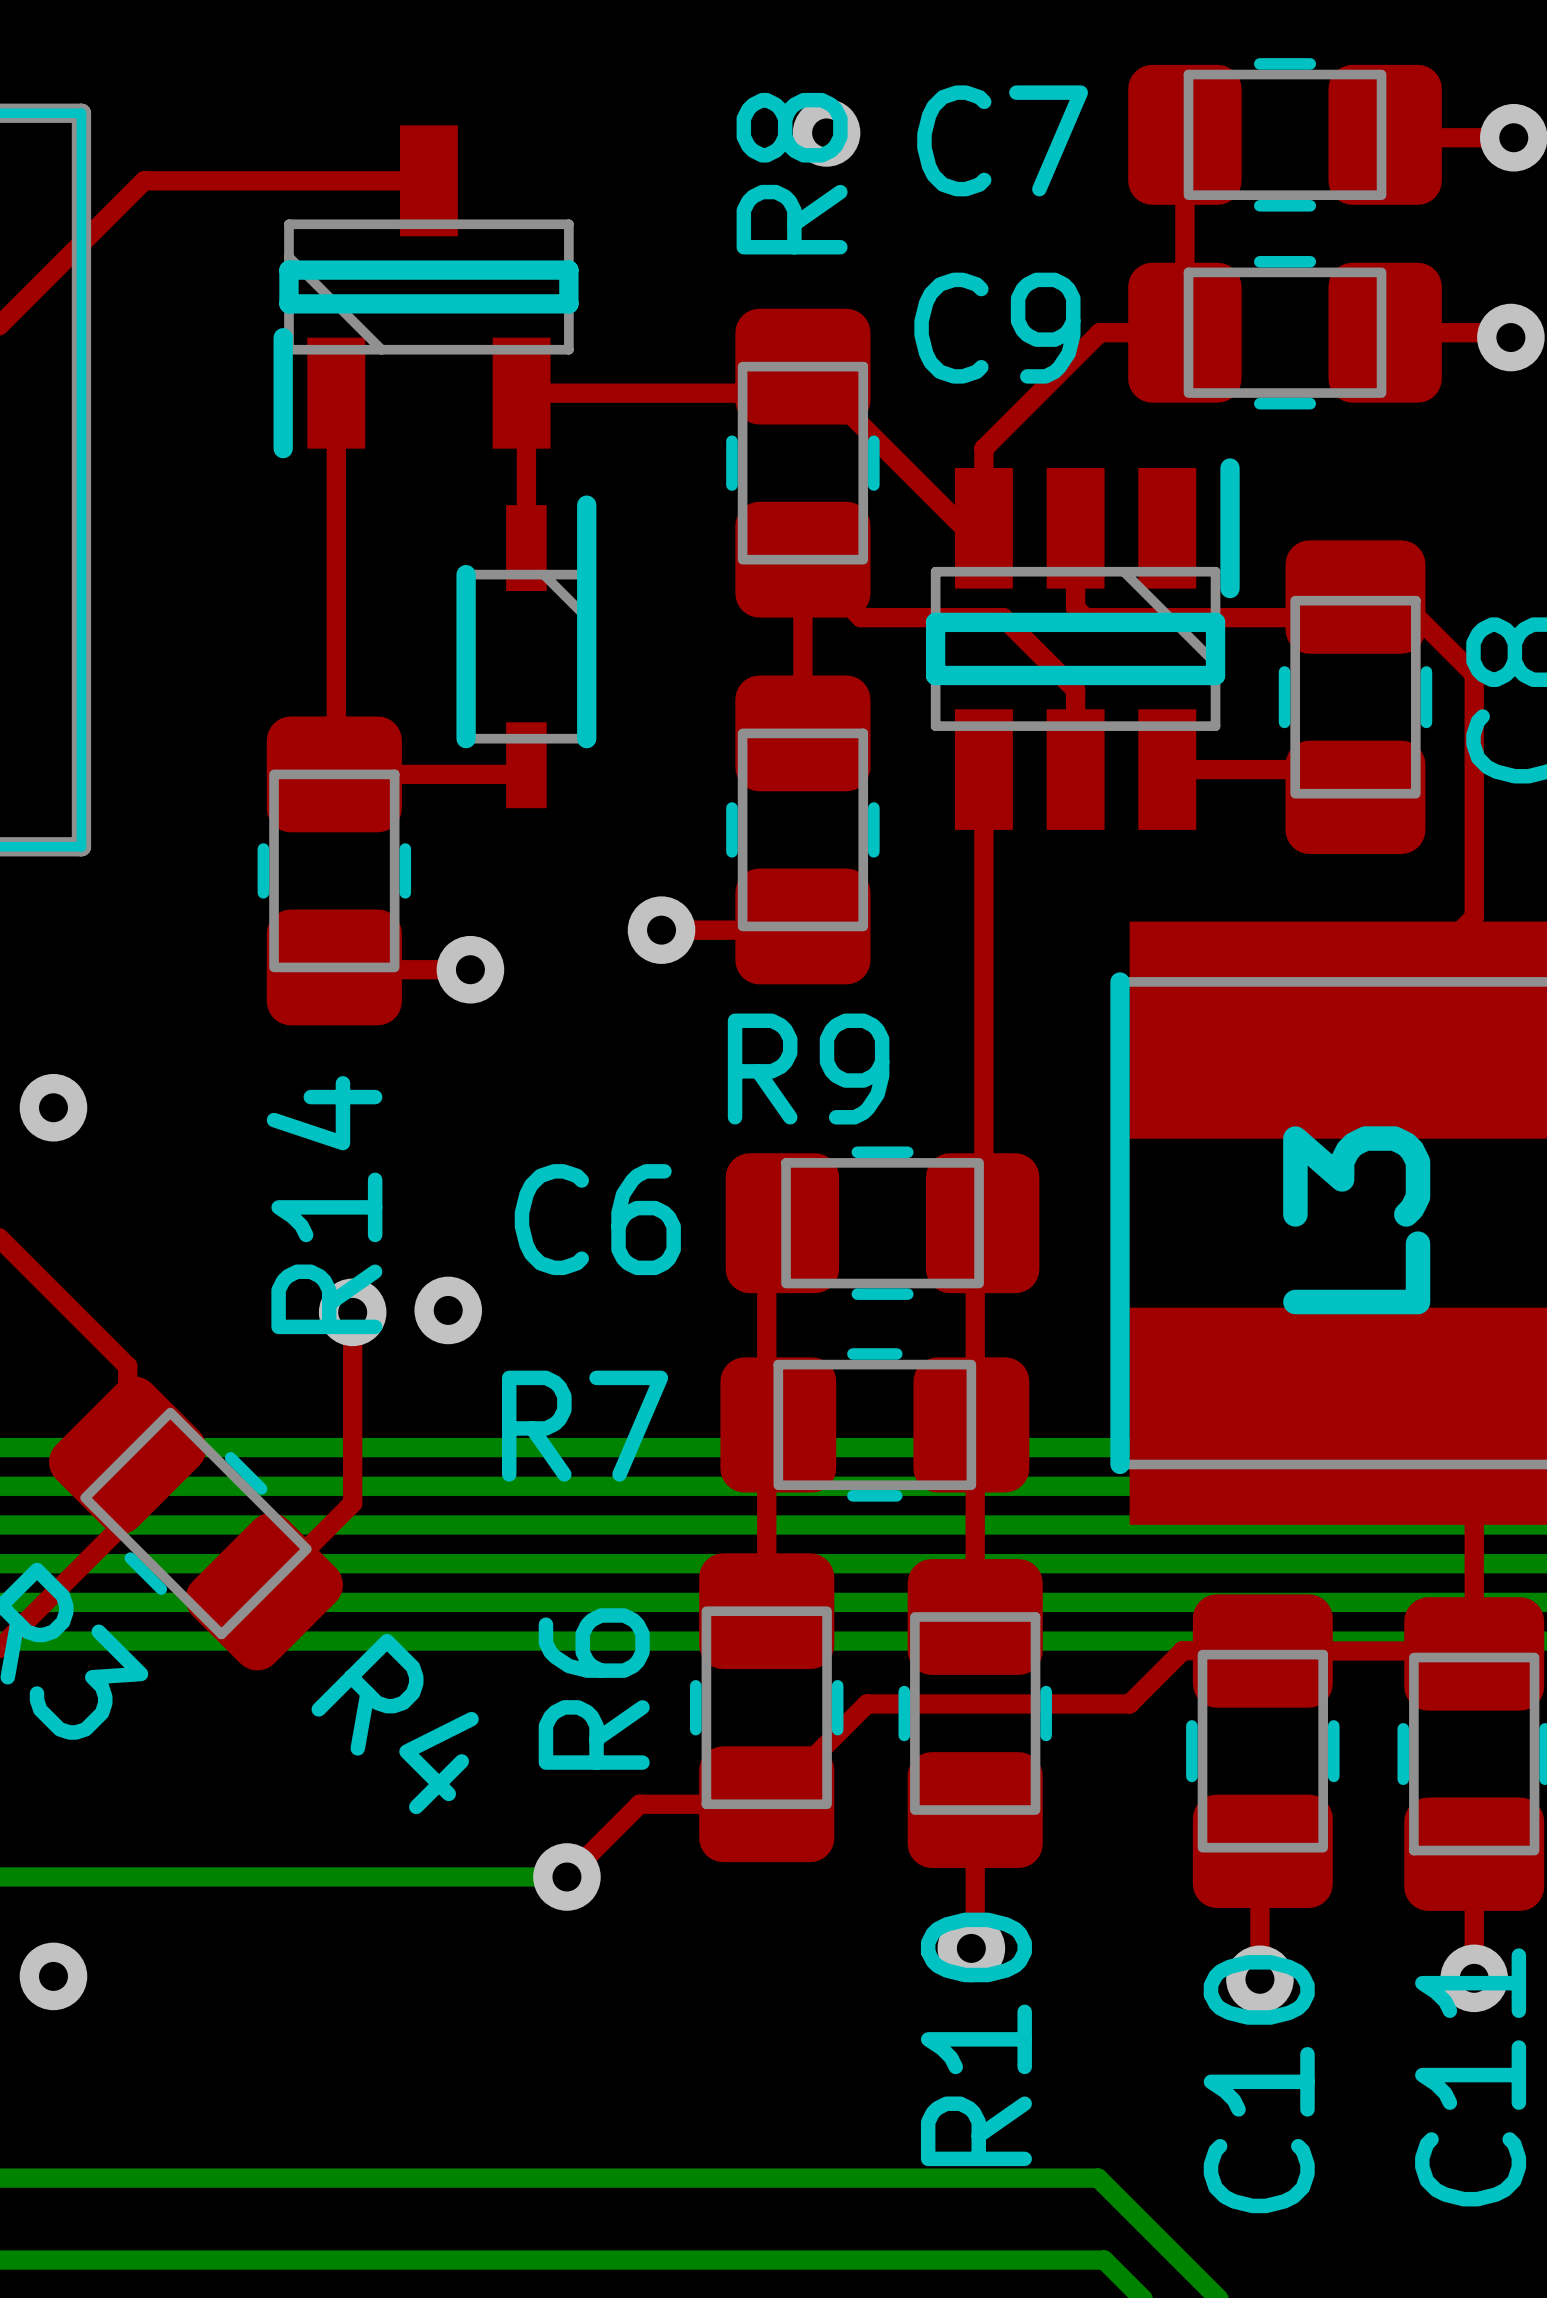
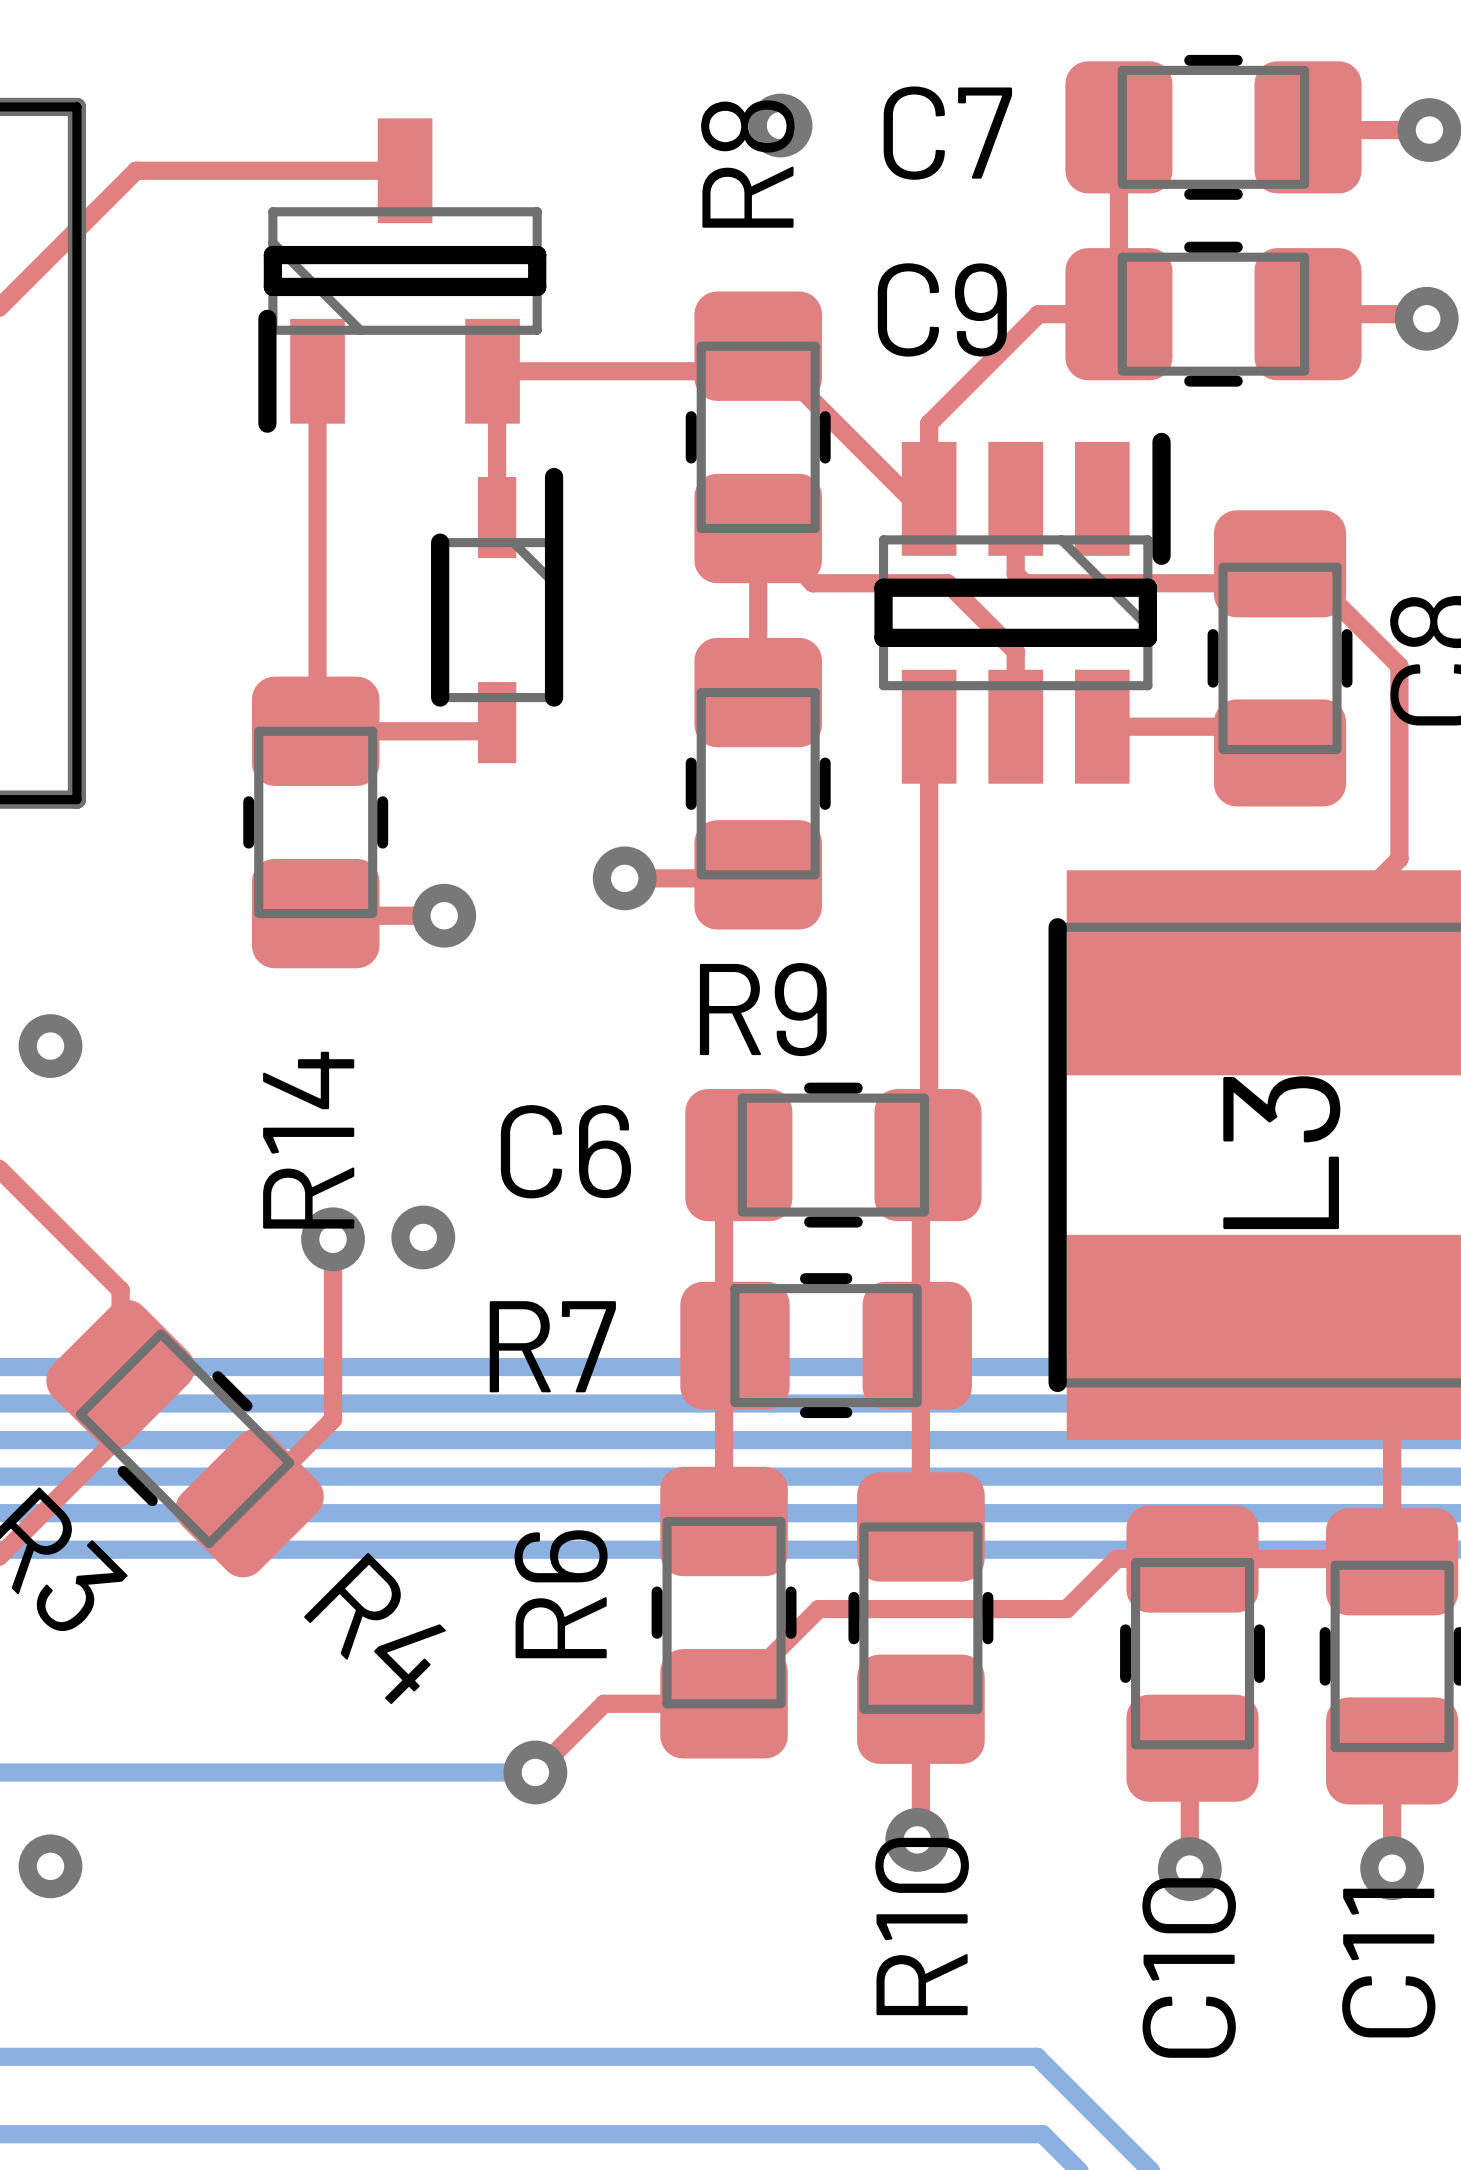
top track: (1373, 597) (1396, 597) (1474, 674) (1474, 917) -> (1297, 563) (1399, 666) (1399, 858) (1392, 866)

